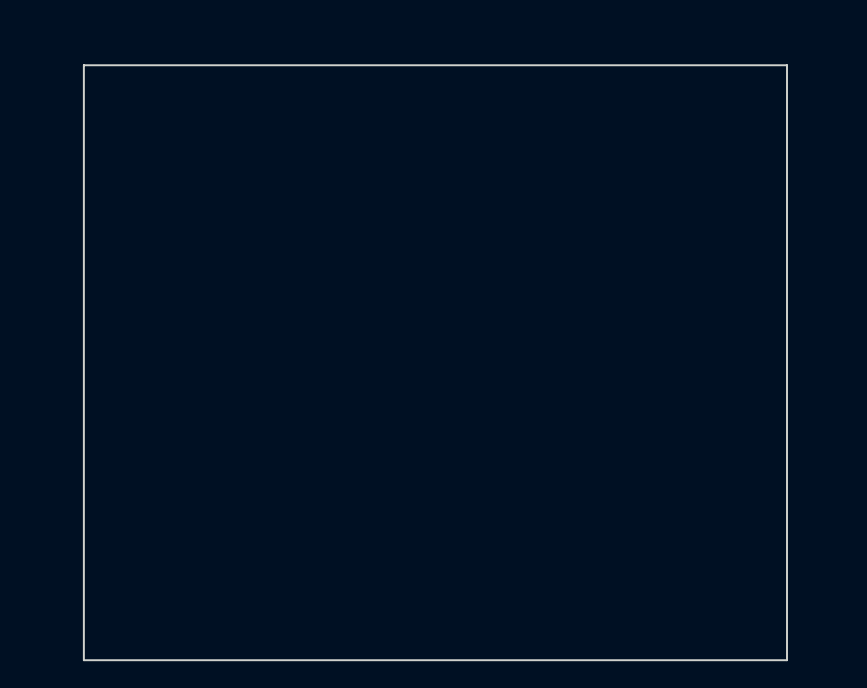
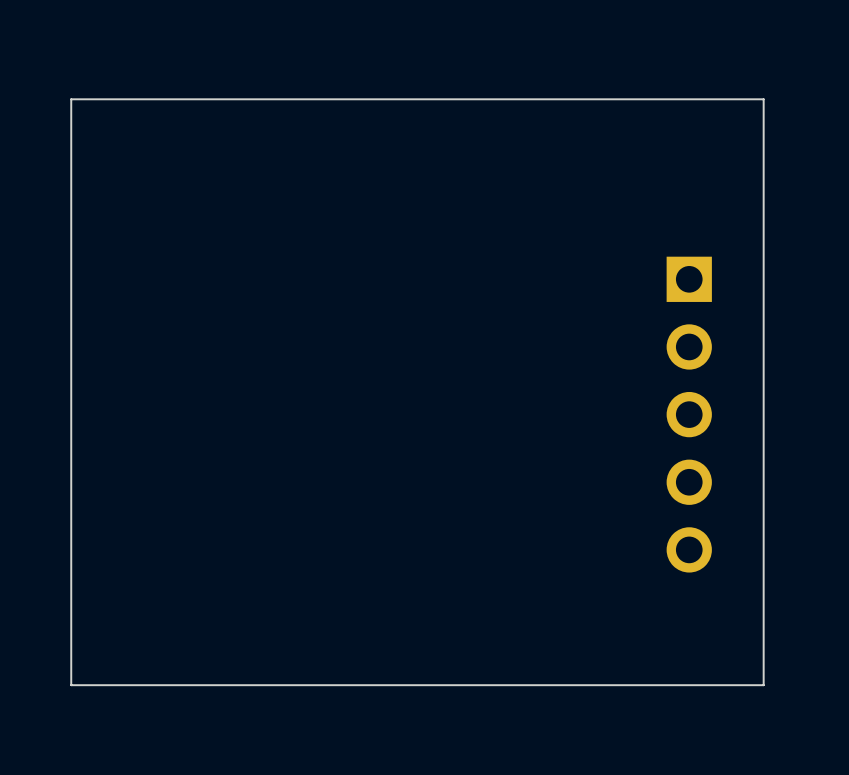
part: none -> (689, 414)

